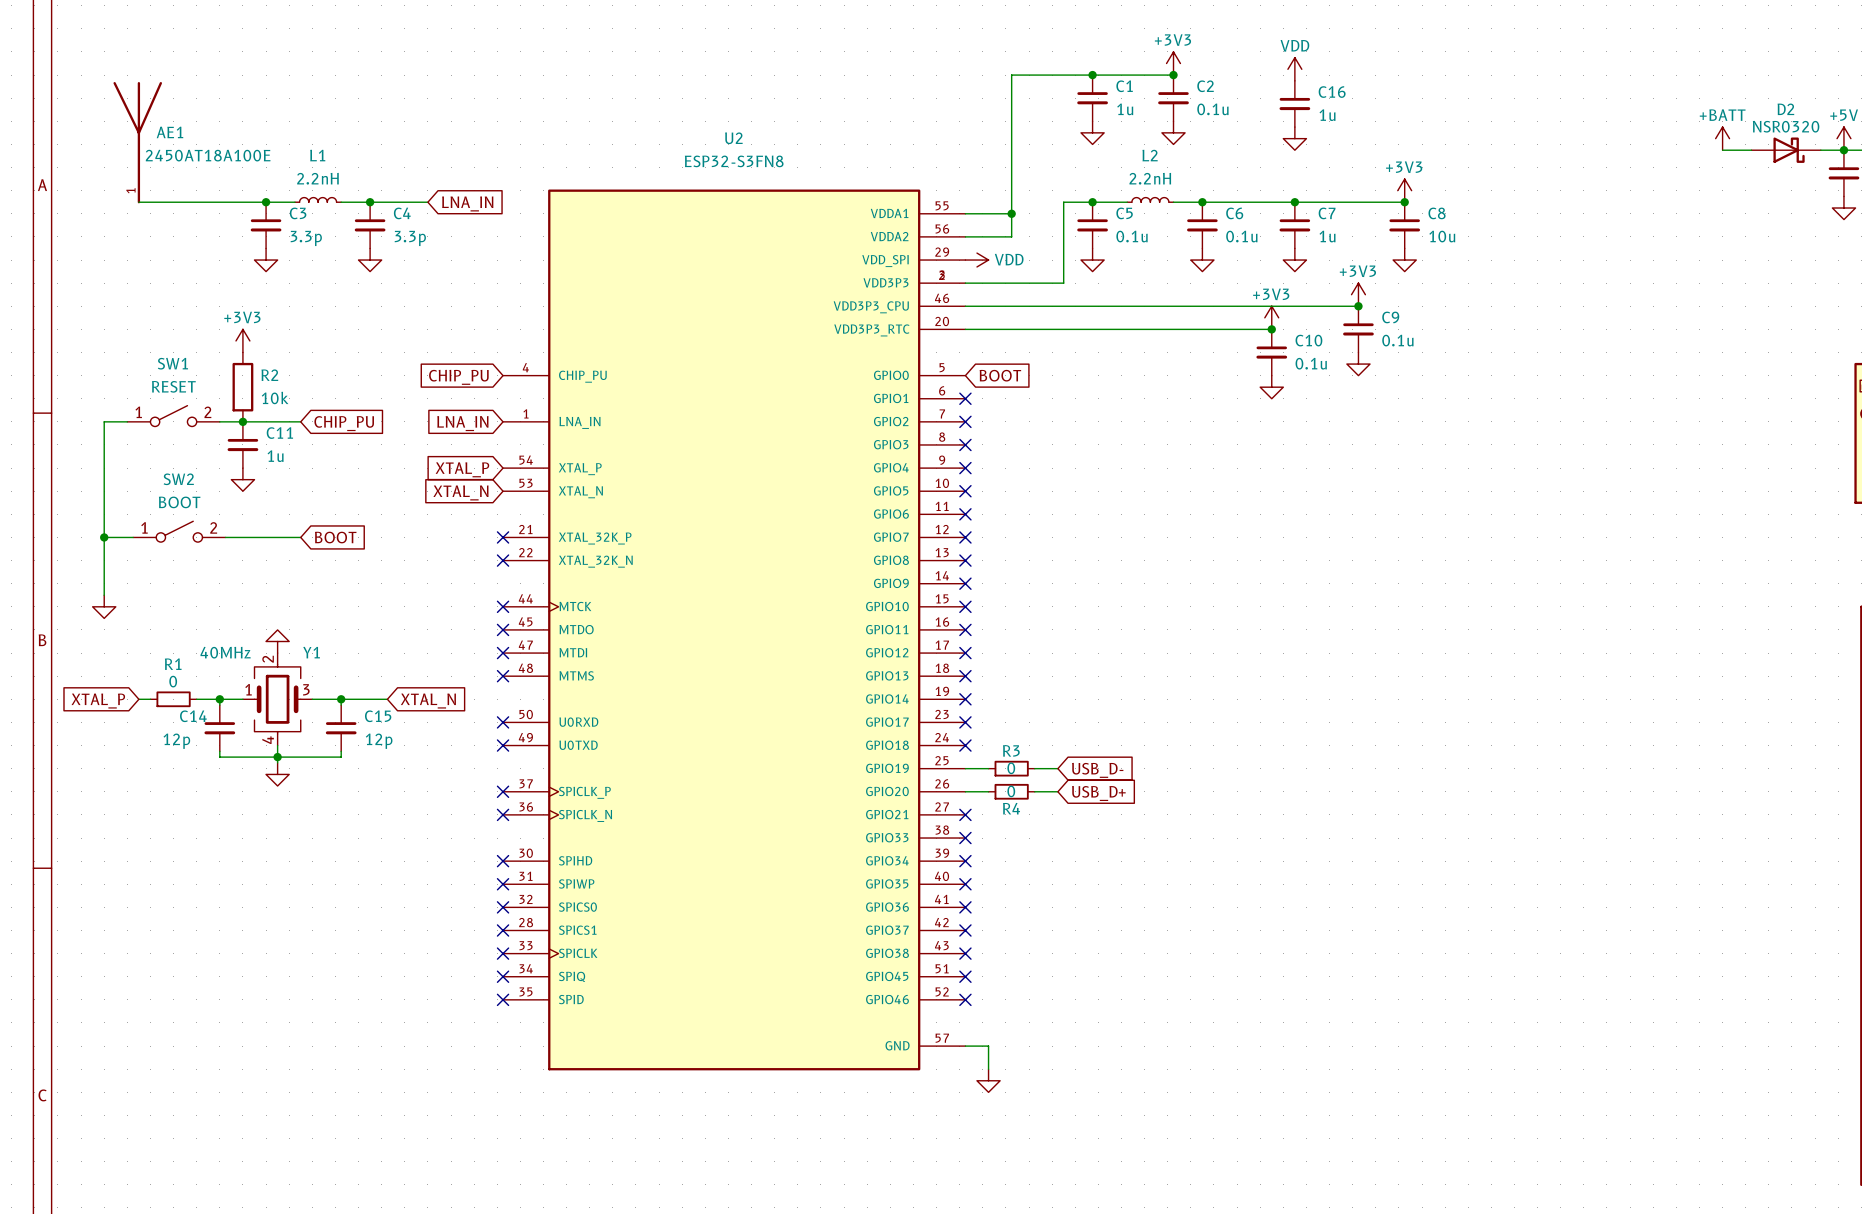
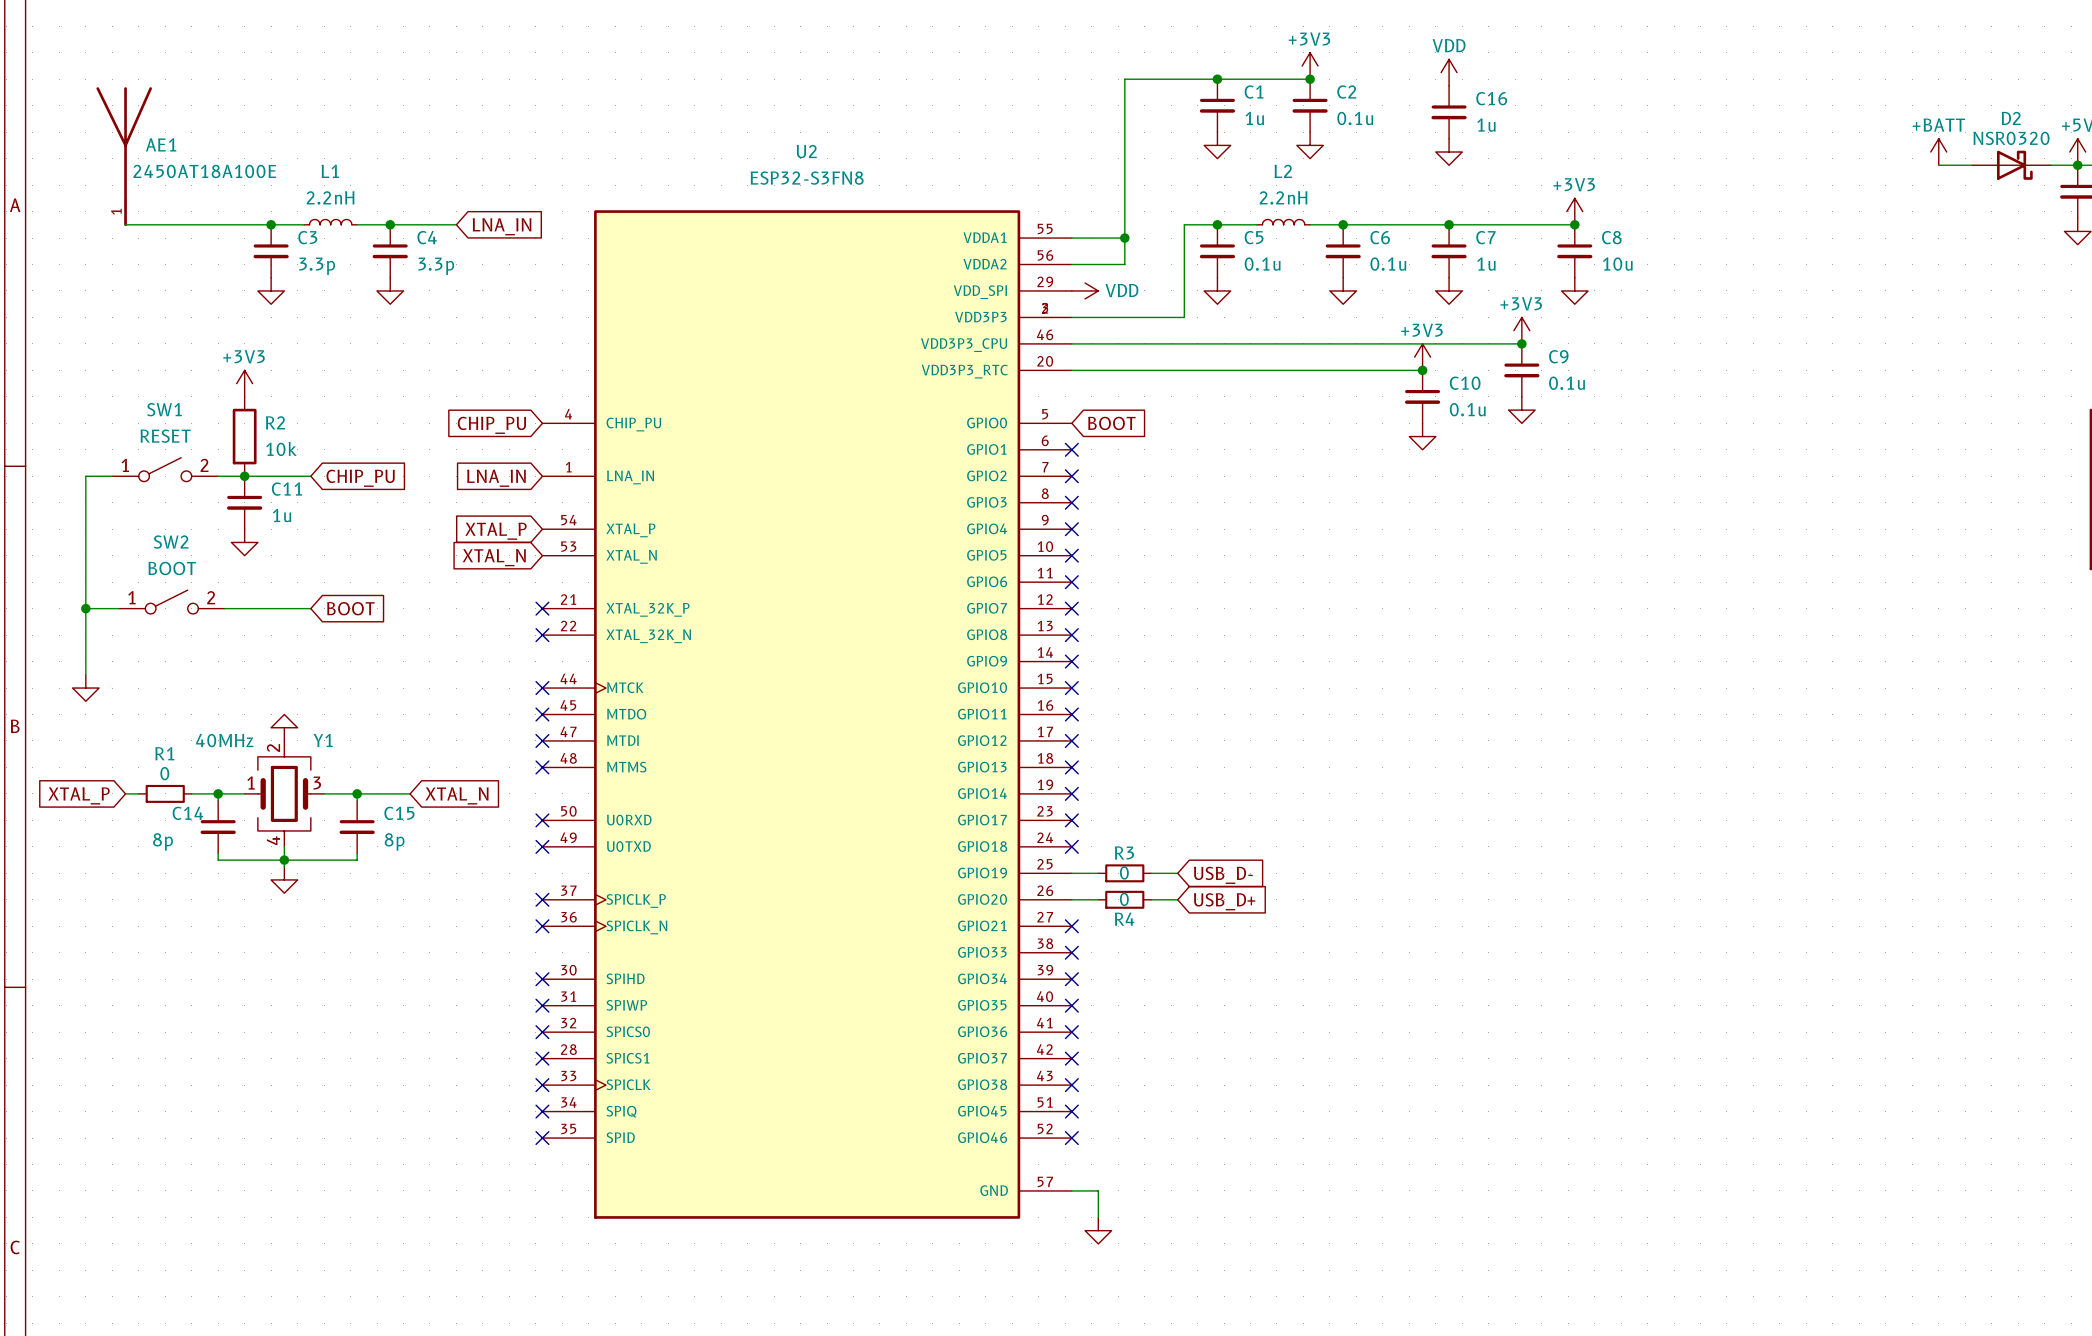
C14 value: 12p (176, 741) -> 8p (163, 841)
C15 value: 12p (379, 741) -> 8p (394, 841)

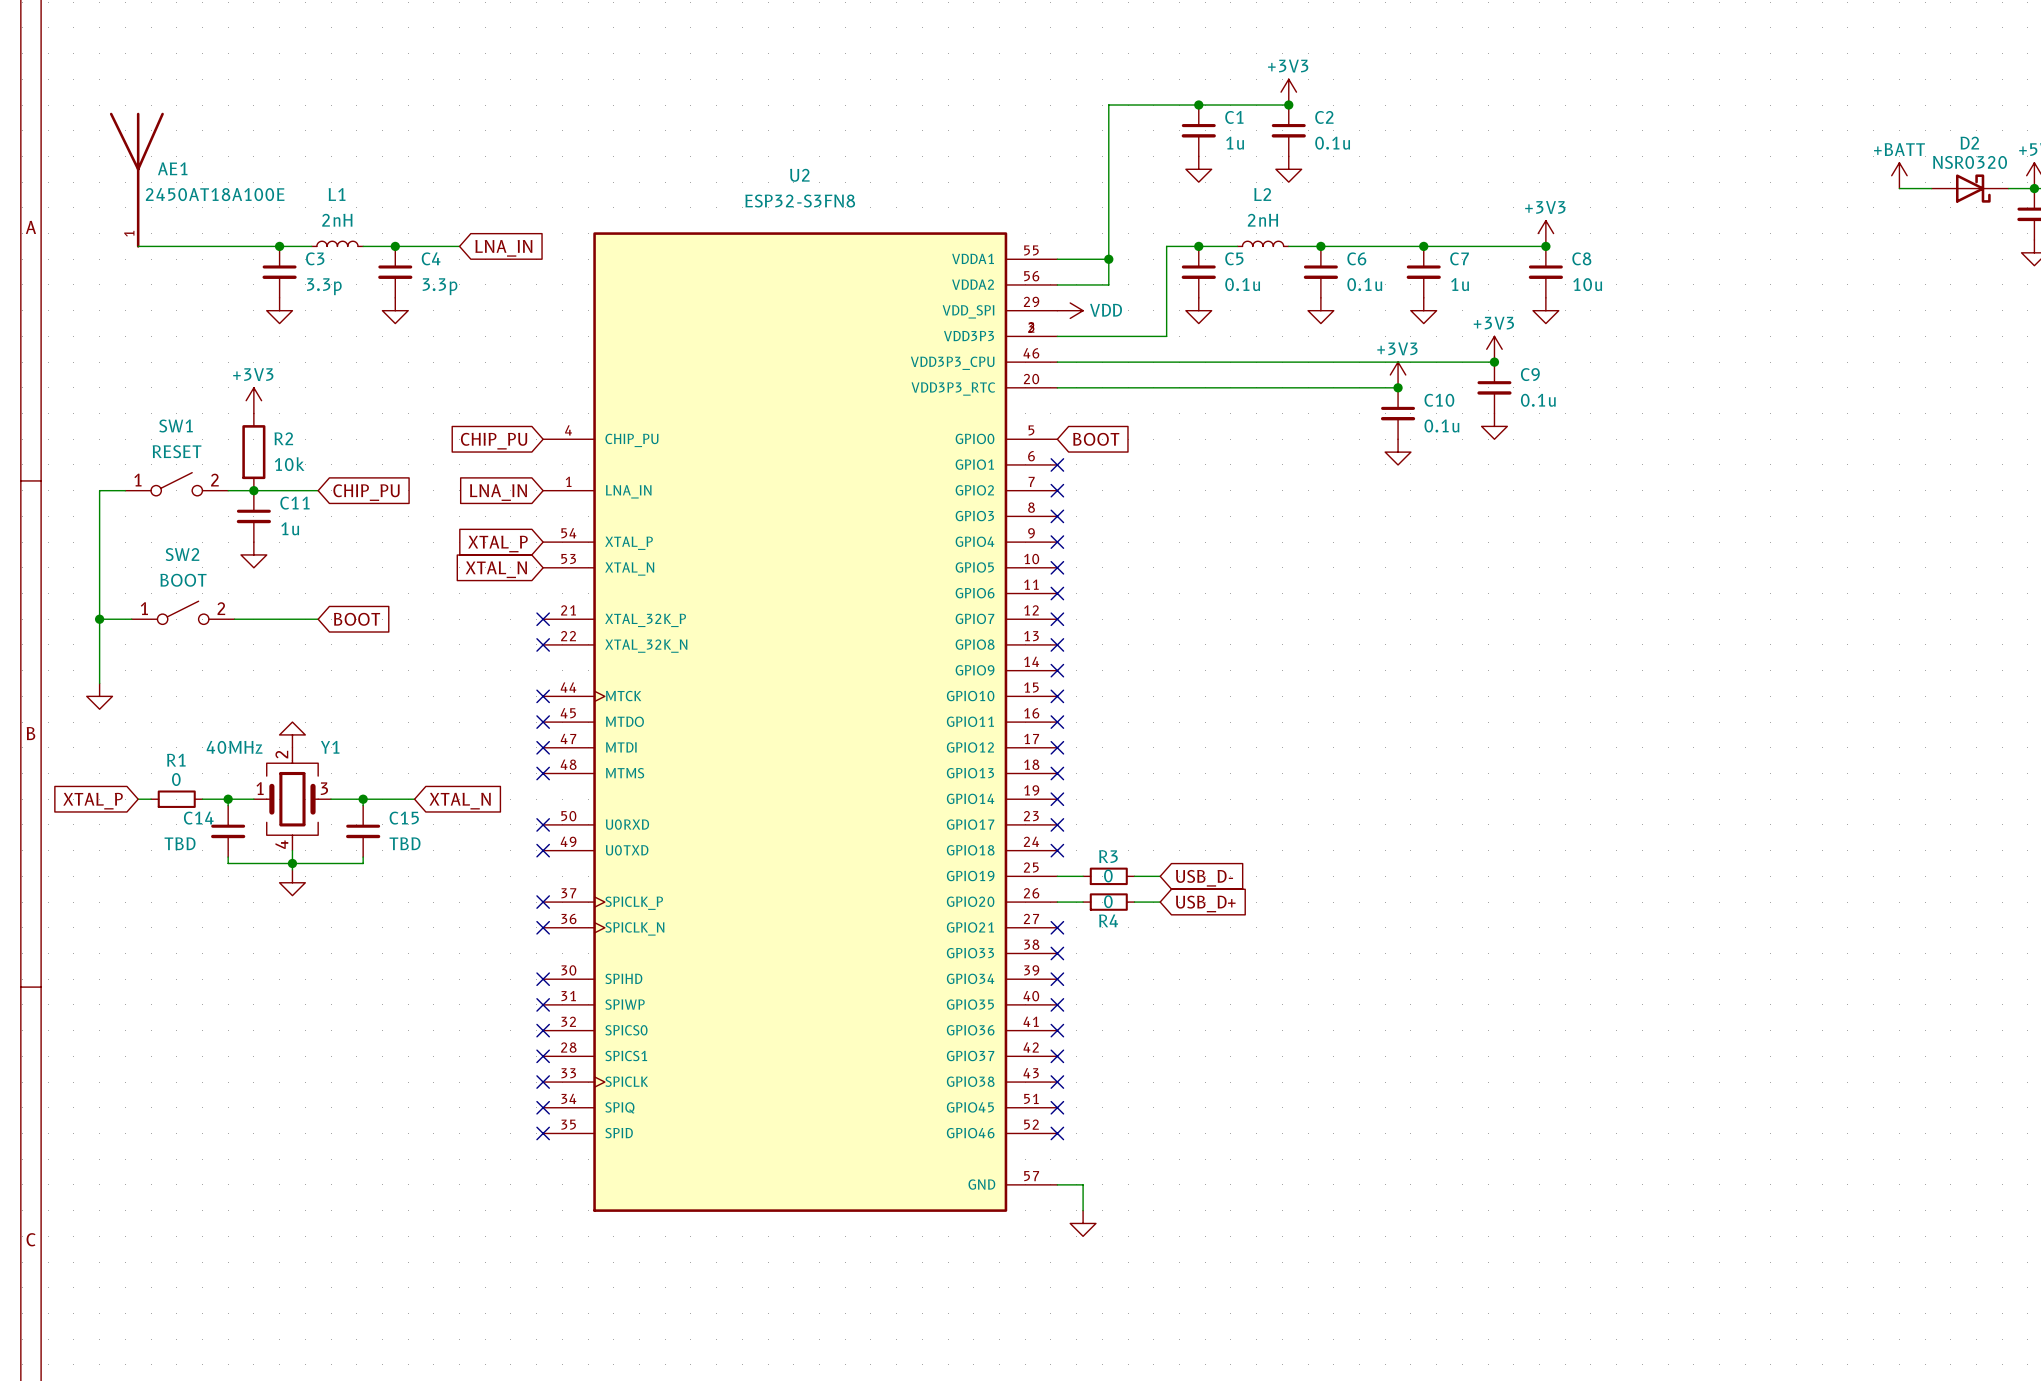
power symbol: VDD (1449, 72) -> none
C16: 1u (1449, 112) -> none
power symbol: (1449, 152) -> none
L1 value: 2.2nH (330, 197) -> 2nH (337, 220)
L2 value: 2.2nH (1283, 197) -> 2nH (1262, 220)
C14 value: 8p (163, 841) -> TBD (180, 843)
C15 value: 8p (394, 841) -> TBD (405, 843)

